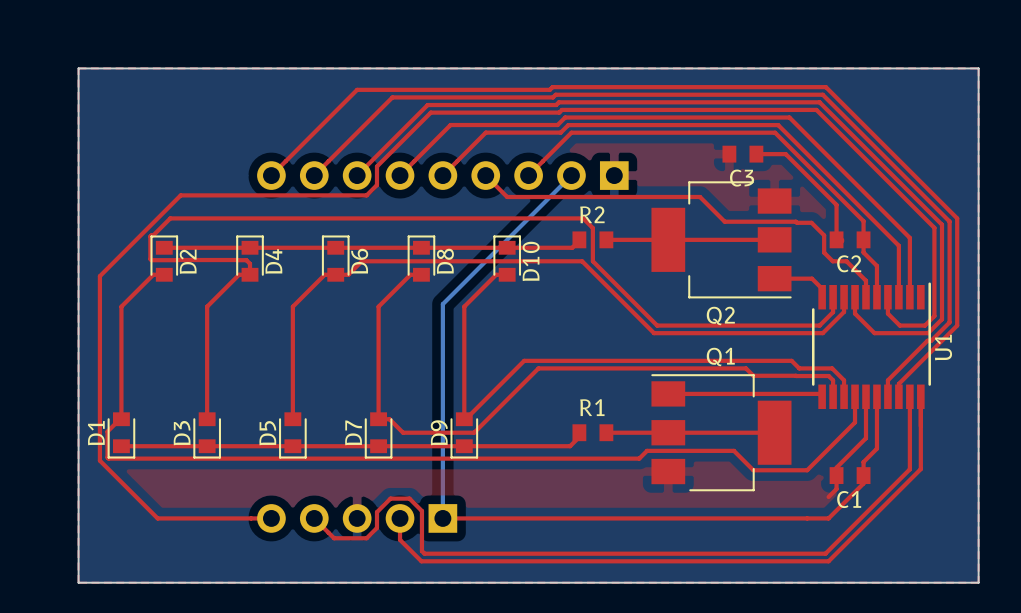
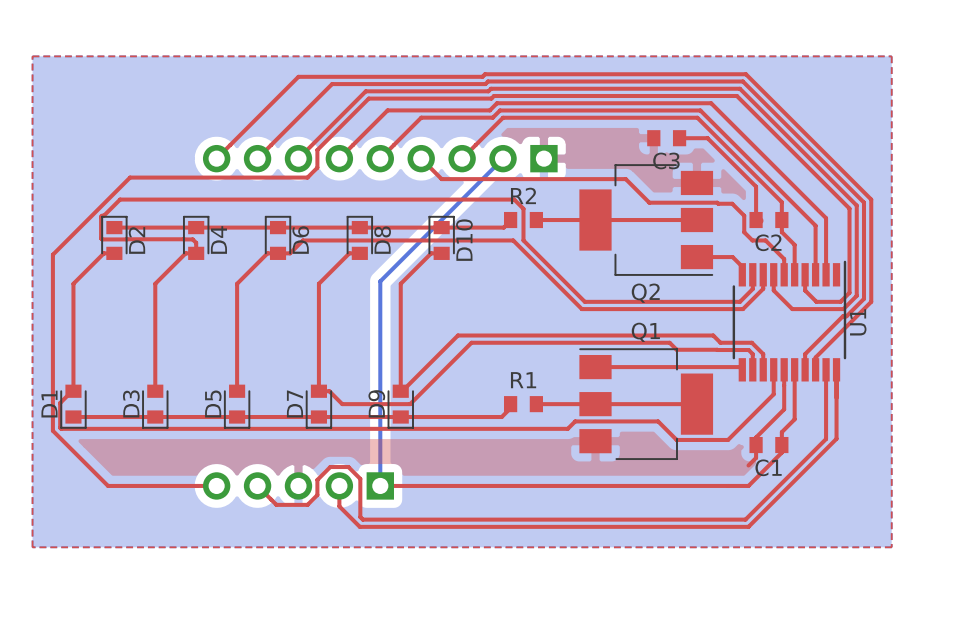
board edge: (78, 68) (78, 582) (978, 582) (978, 68) (78, 68) -> none

